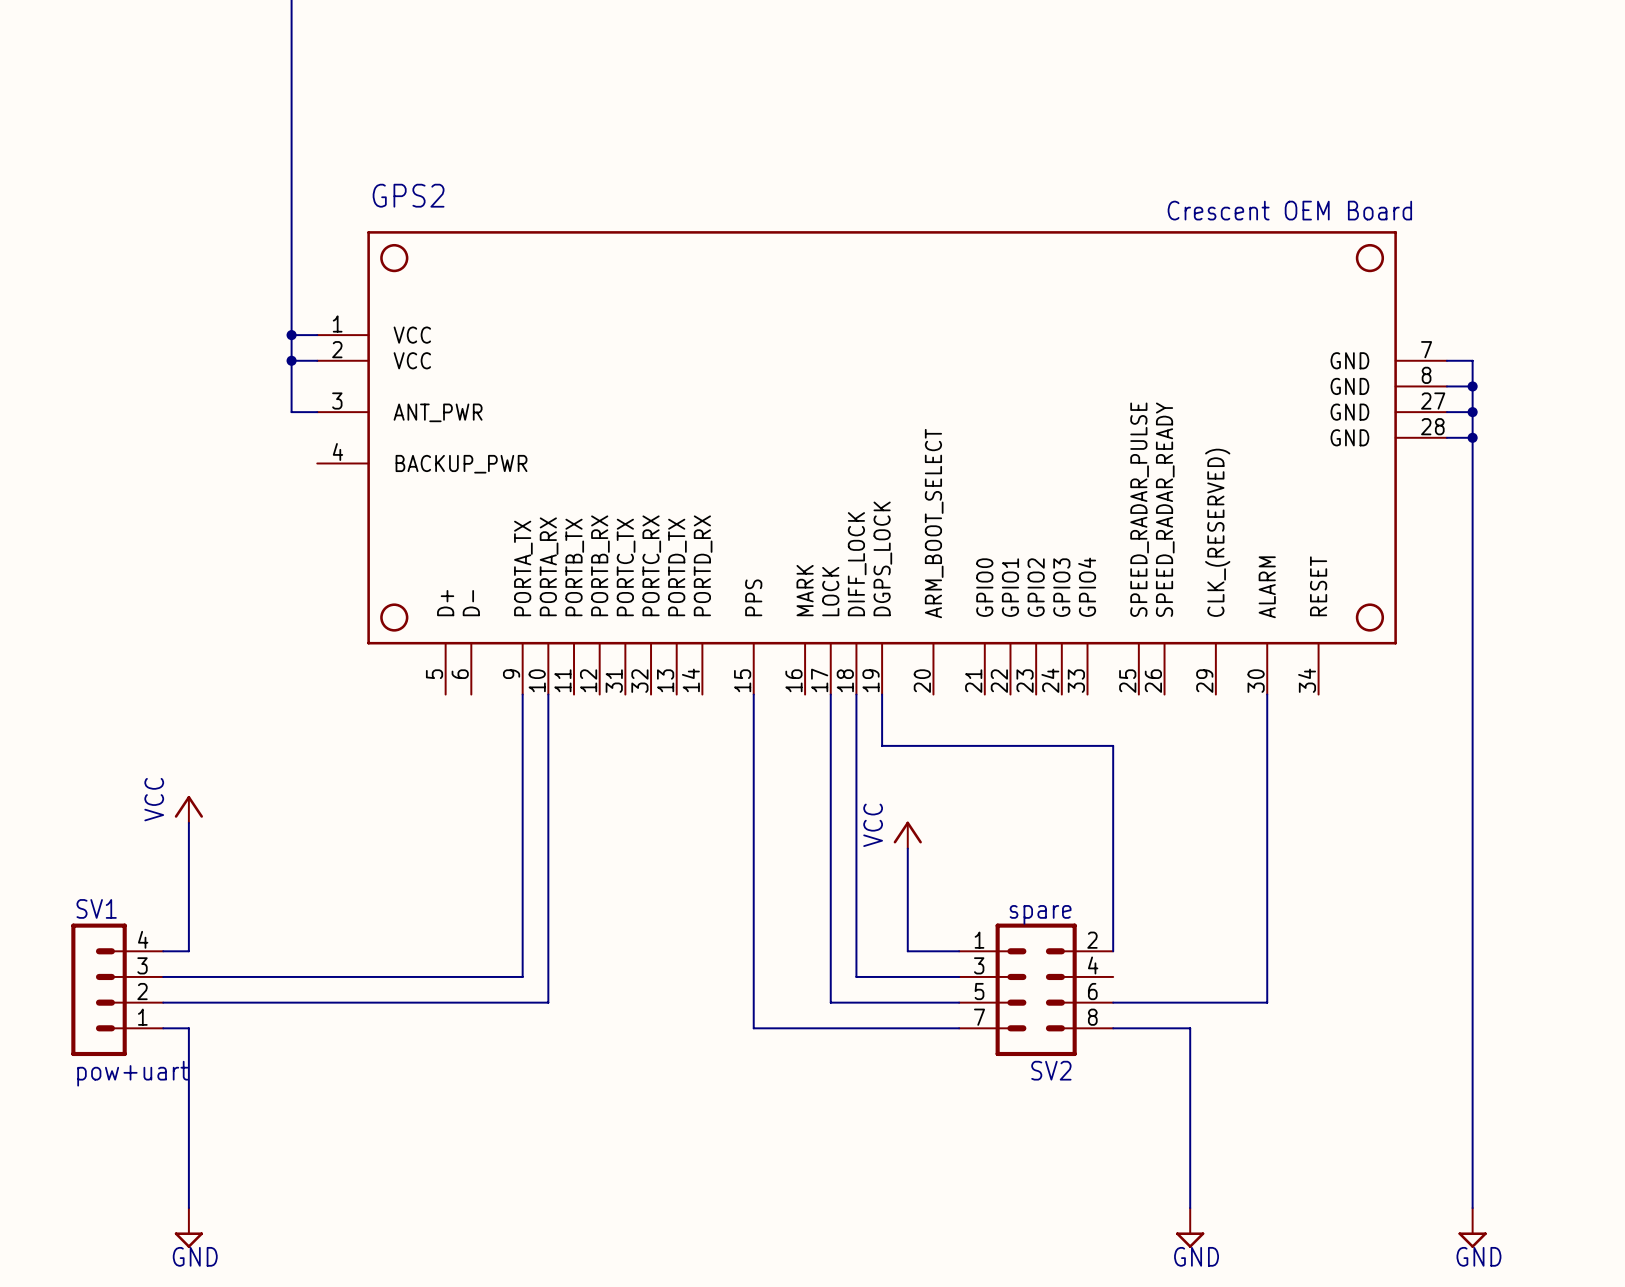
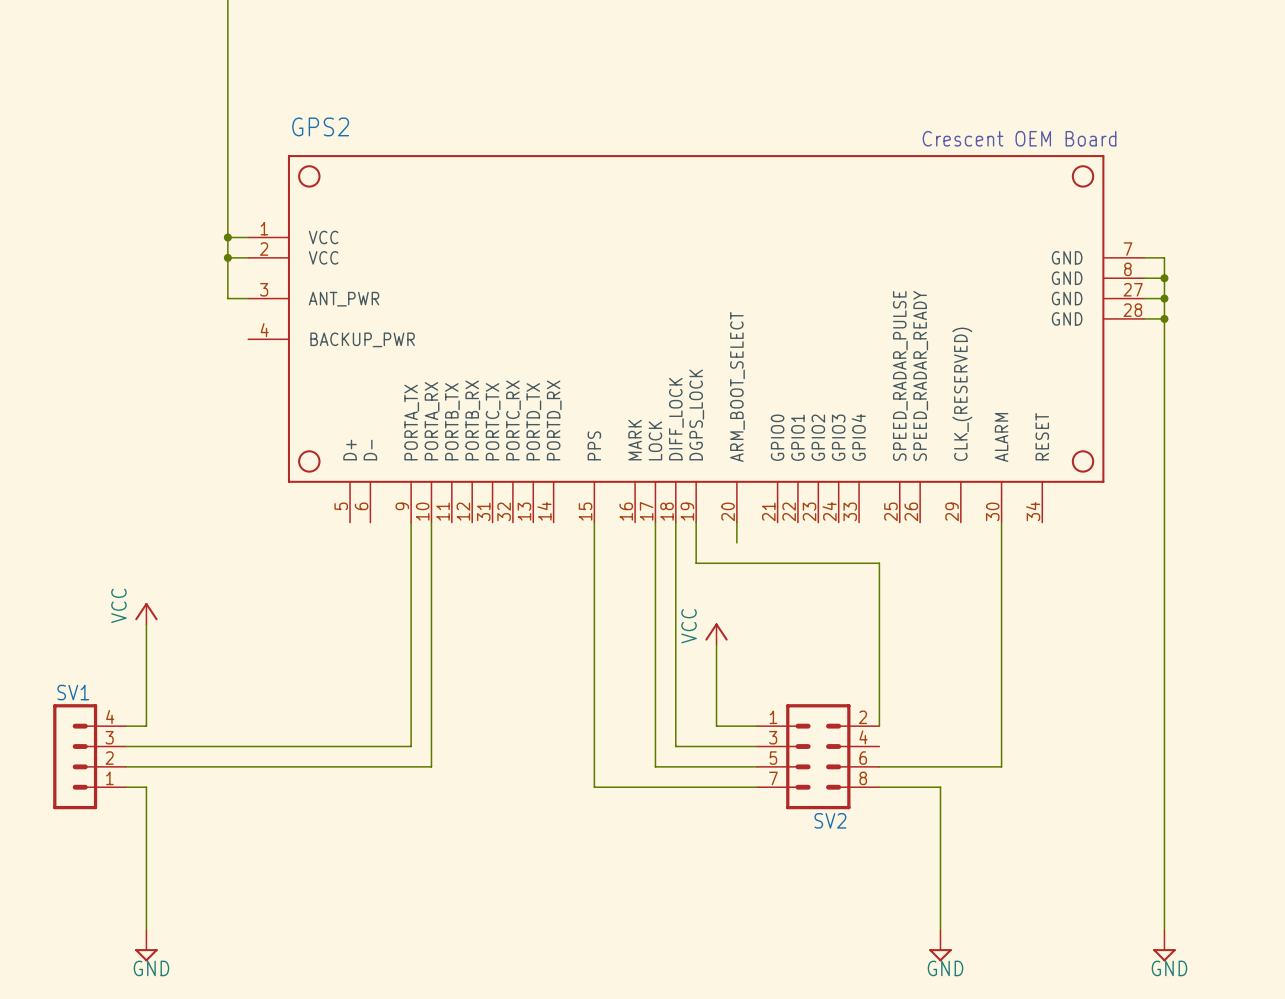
wire: none -> (736, 522) (736, 542)
SV2 value: spare (1040, 914) -> none
SV1 value: pow+uart (132, 1073) -> none

